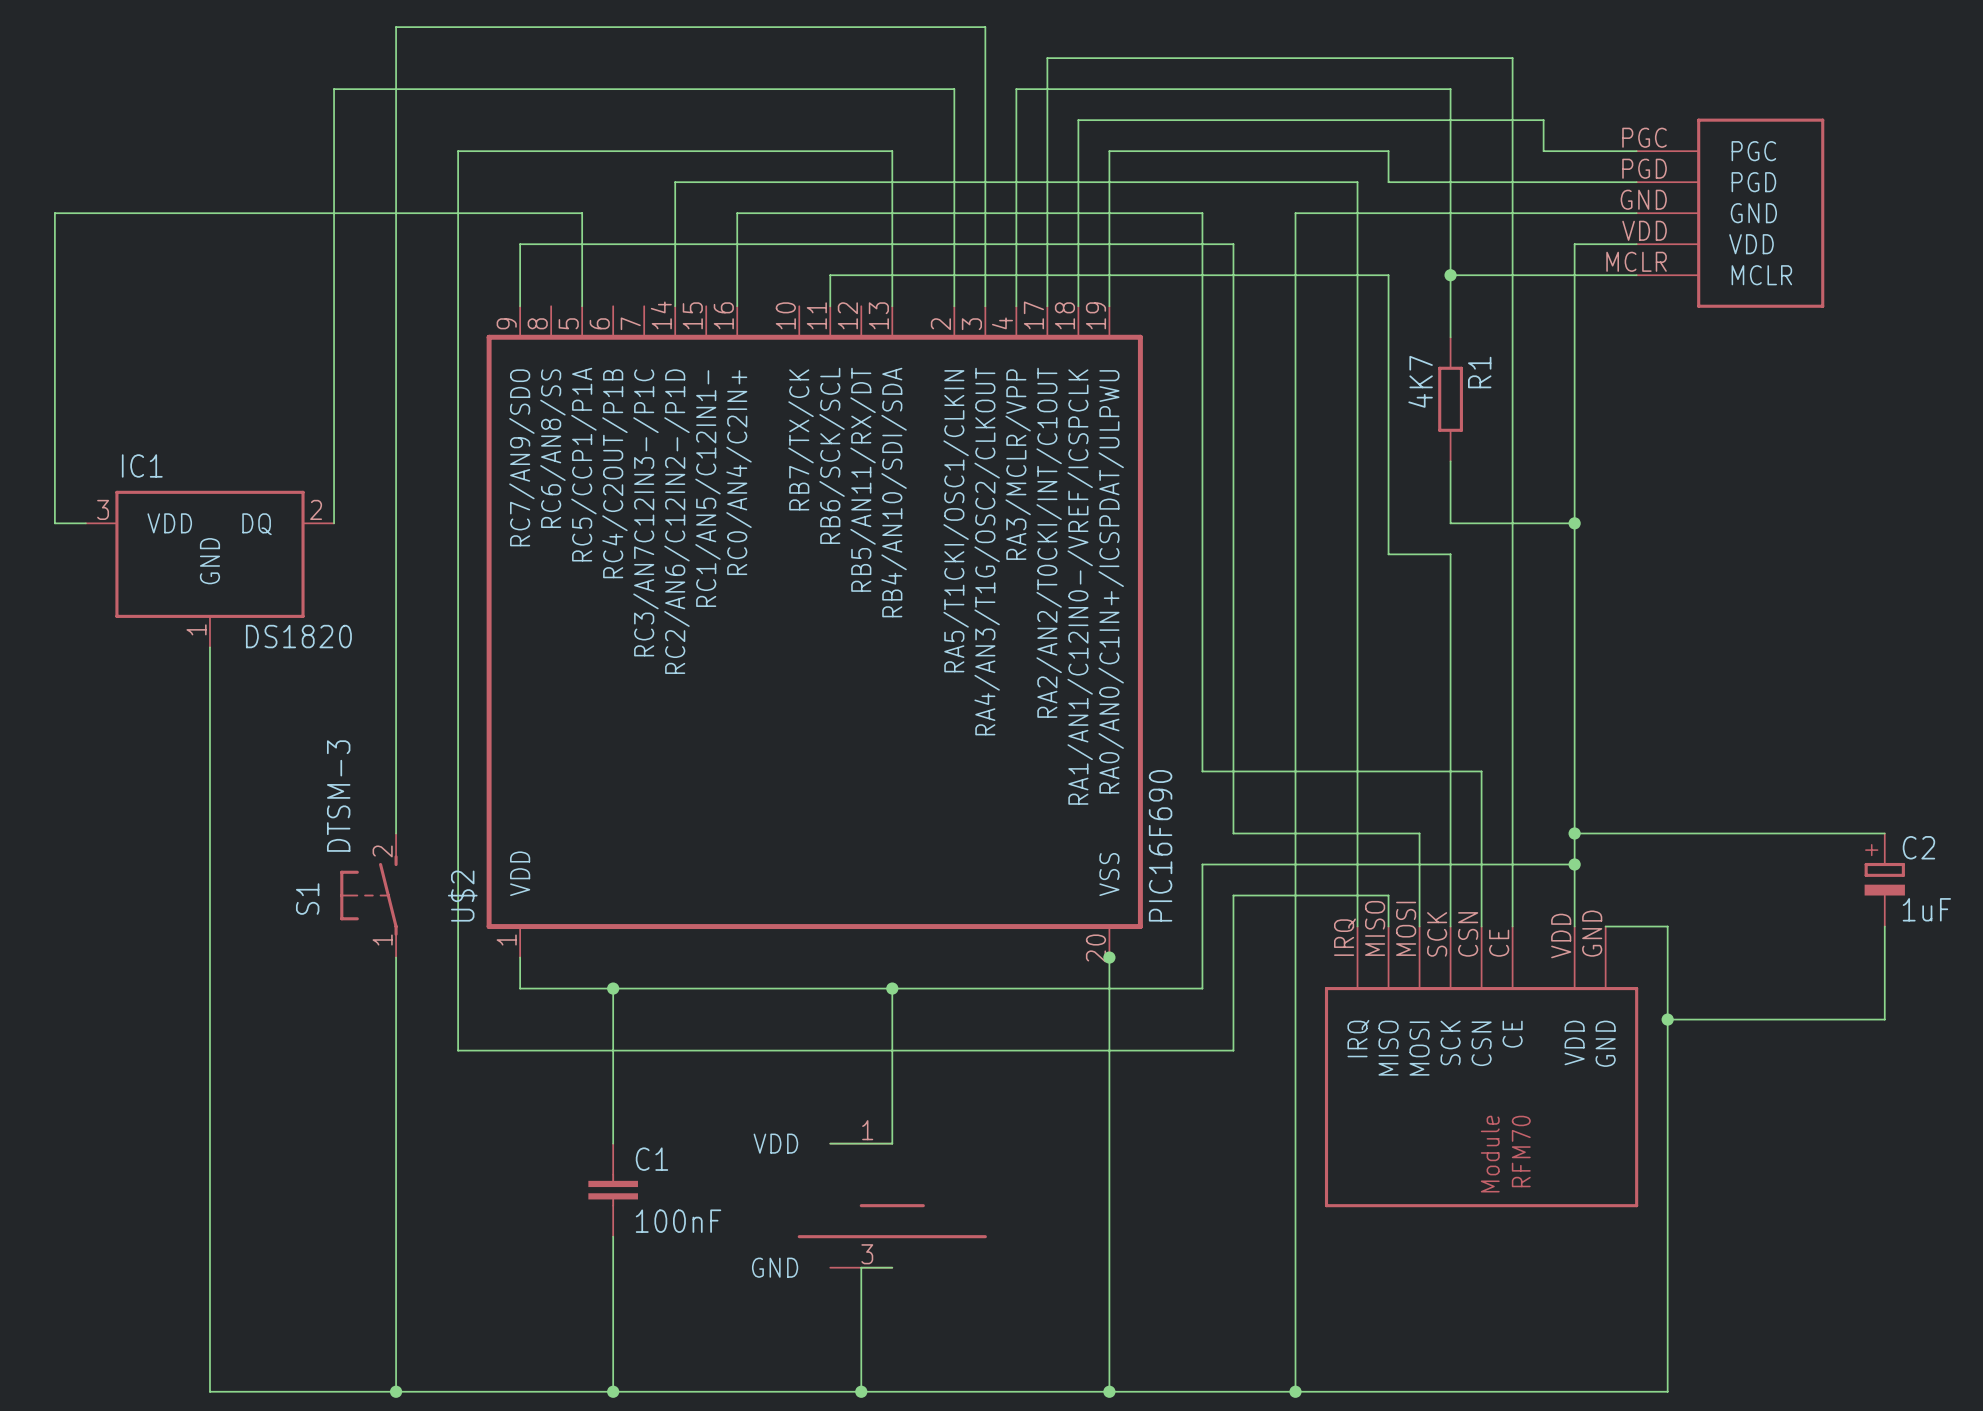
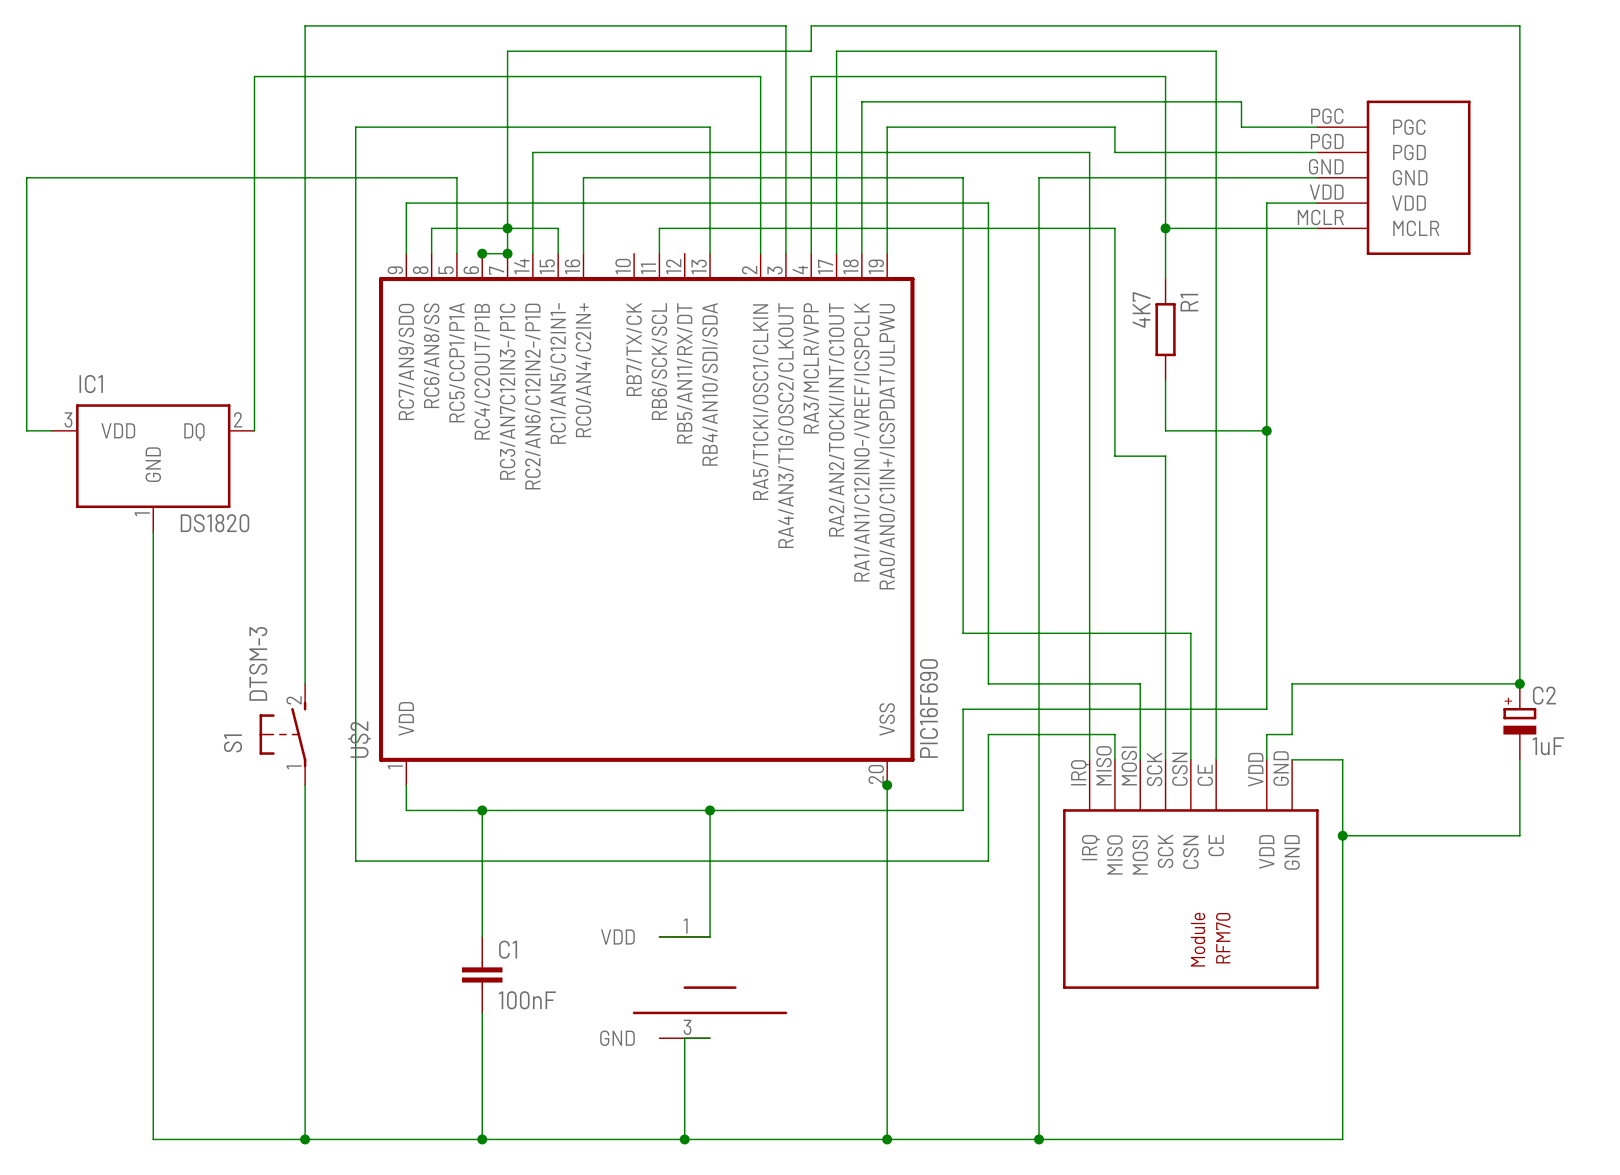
junction: none -> (507, 228)
wire: none -> (431, 253) (431, 228) (558, 228) (558, 253)
wire: none -> (482, 253) (507, 253) (507, 51) (811, 51) (811, 25) (1519, 25) (1519, 683)
junction: none -> (482, 253)
junction: none -> (507, 253)
wire: (1574, 833) (1605, 833) -> none
junction: (1574, 833) -> none
junction: none -> (1519, 683)
wire: (1574, 864) (1574, 895) -> (1292, 683) (1292, 734) (1266, 734)
junction: (1574, 864) -> none

